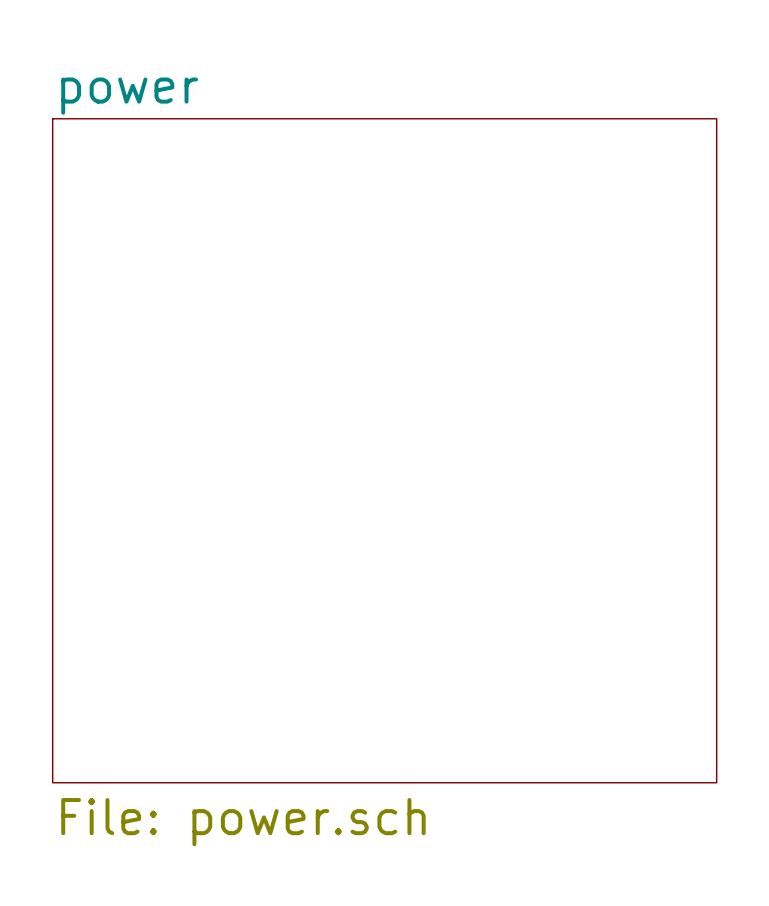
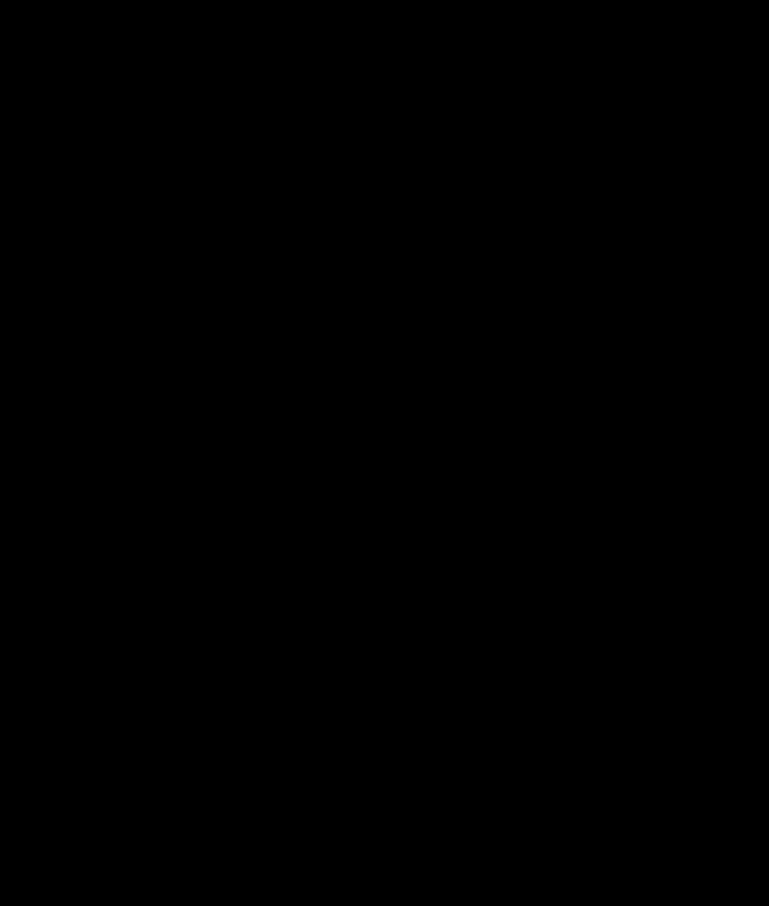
sheet power: File: power.sch (384, 450) -> none

